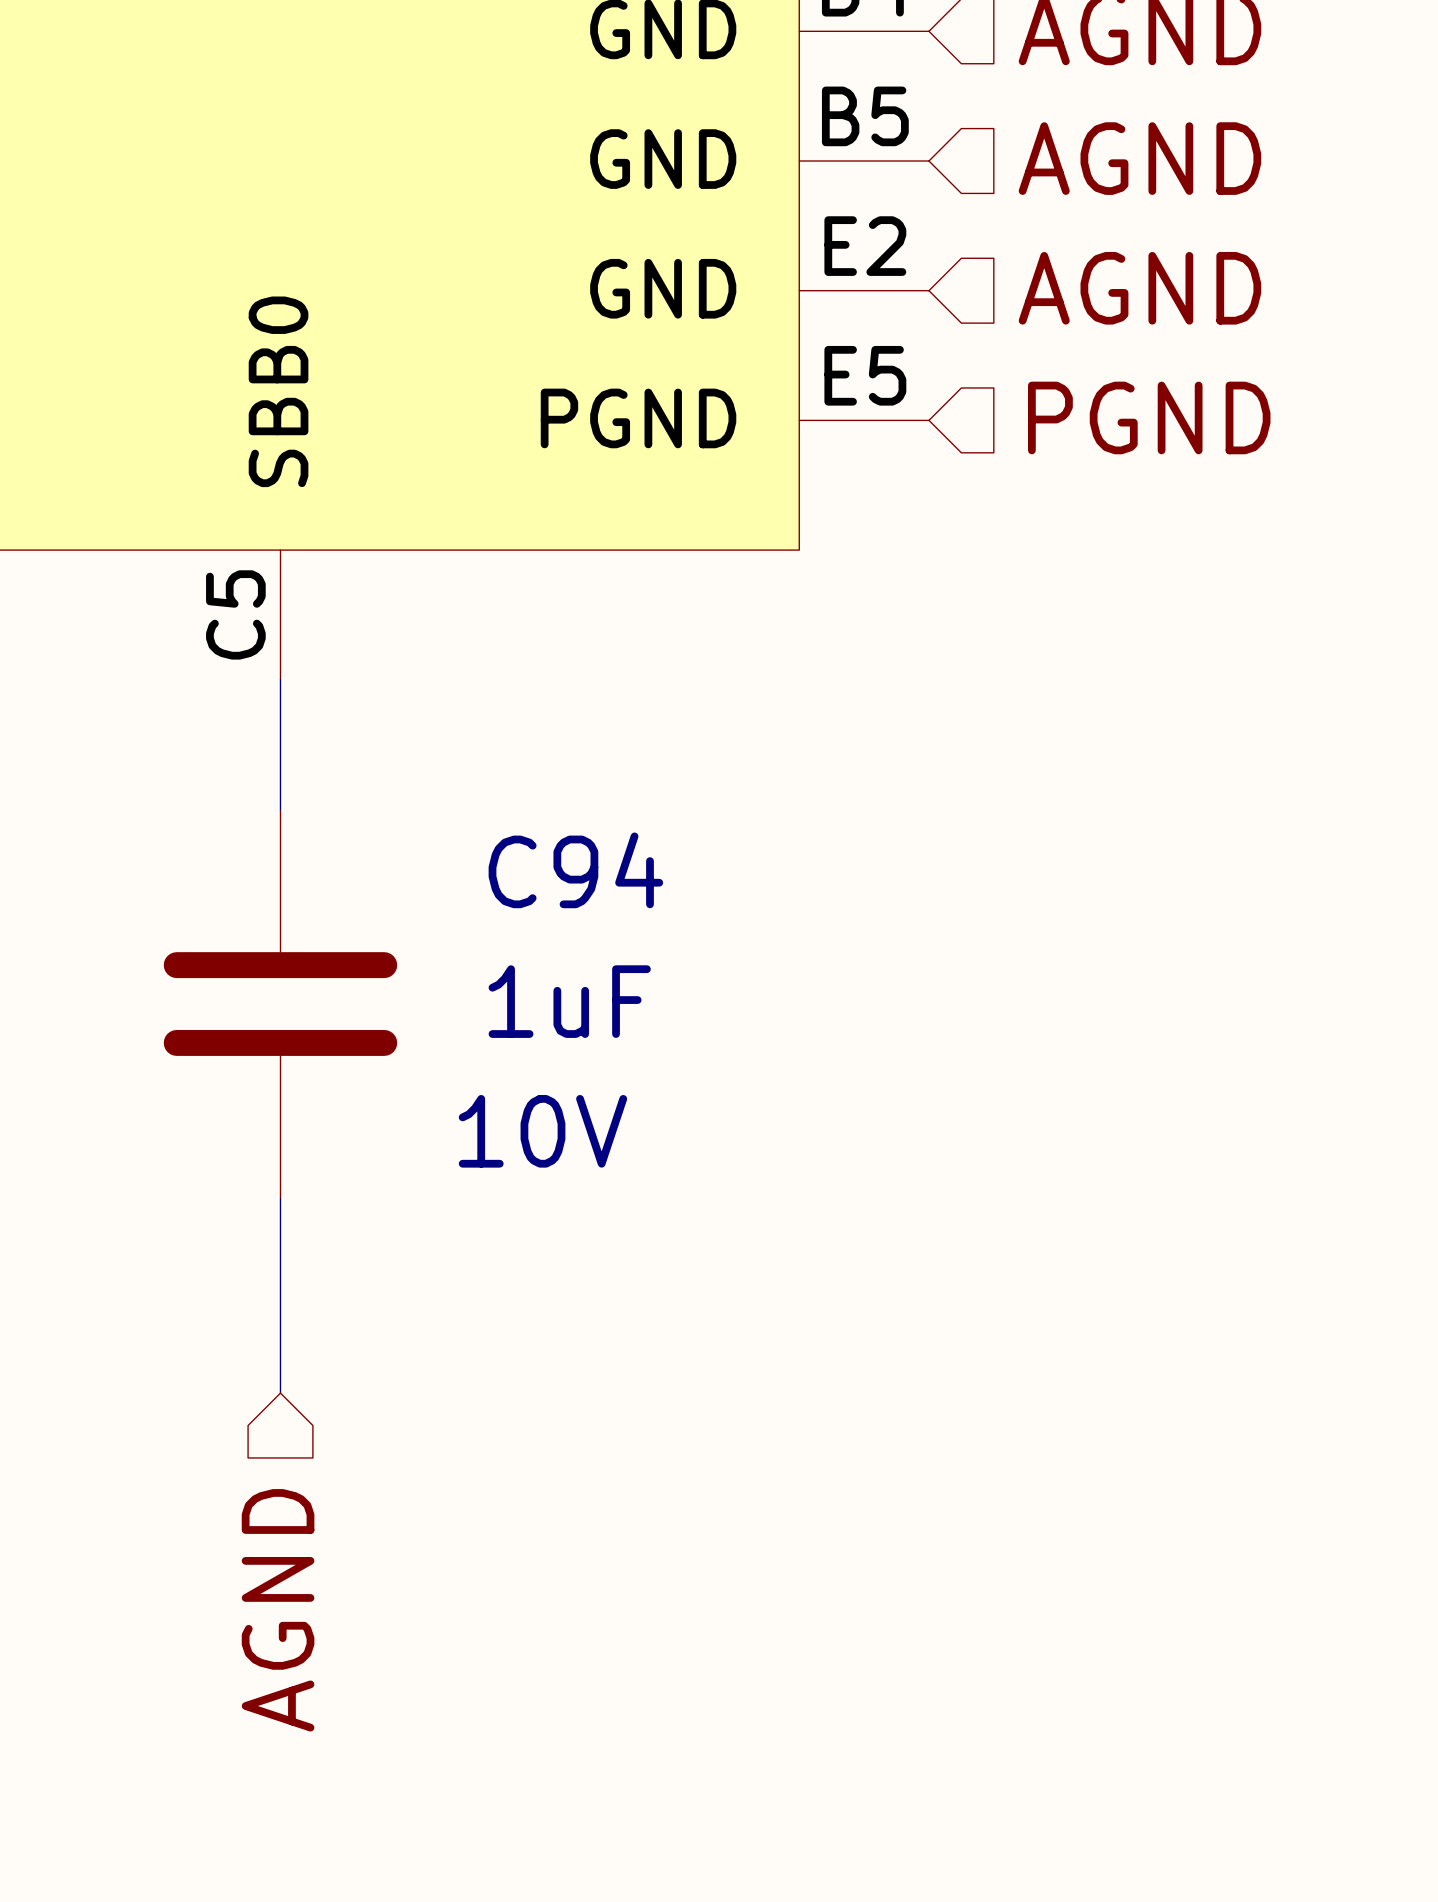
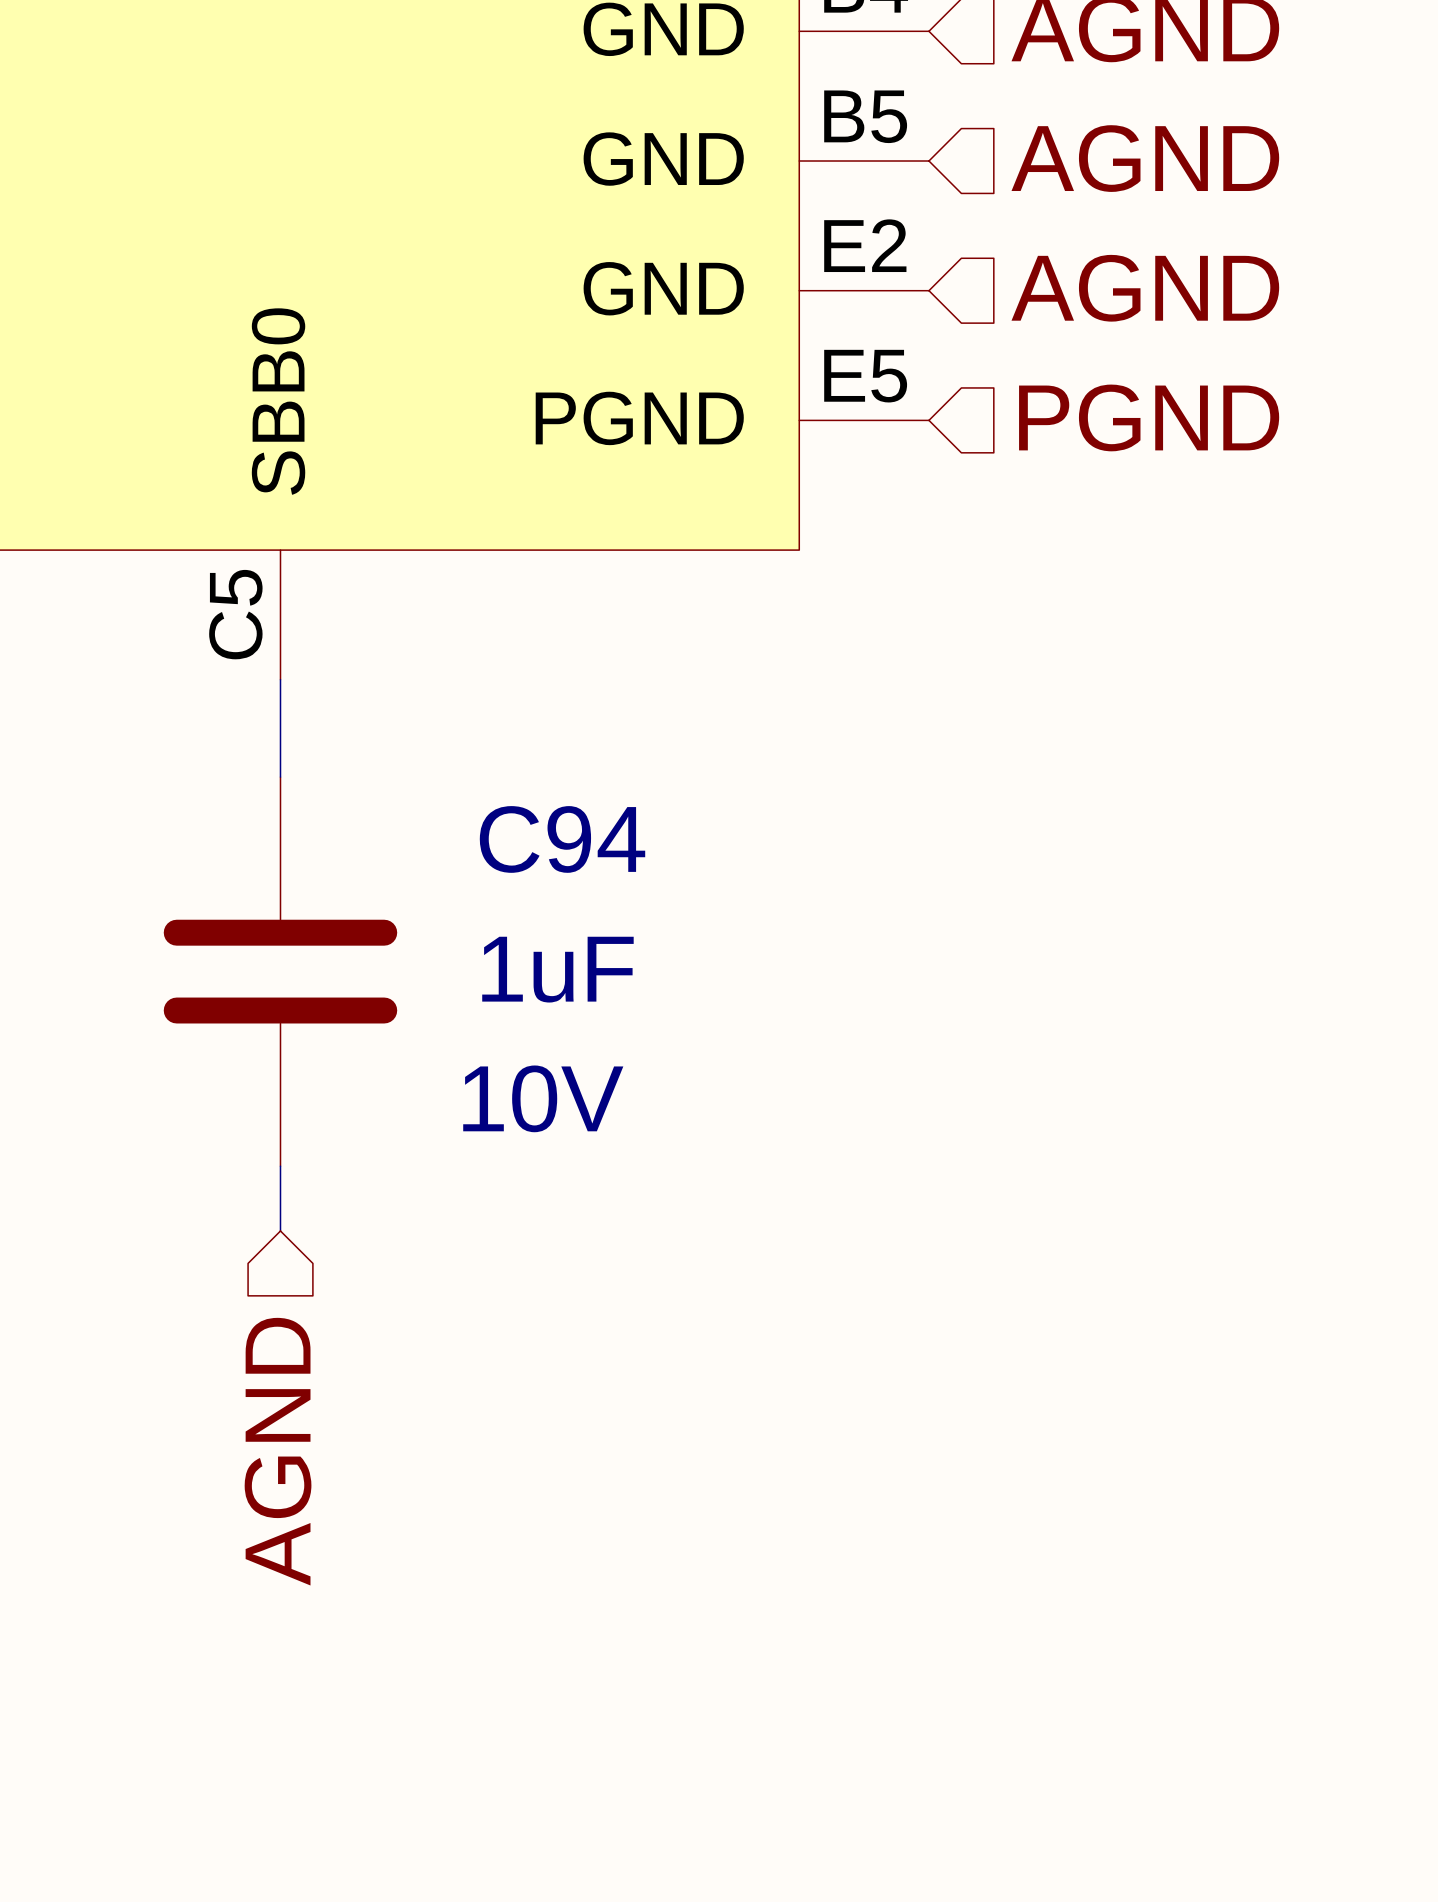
C94 position: (280, 1004) -> (280, 971)
wire: (280, 1231) (280, 1393) -> none
hierarchical label position: AGND (278, 1610) -> AGND (278, 1451)

